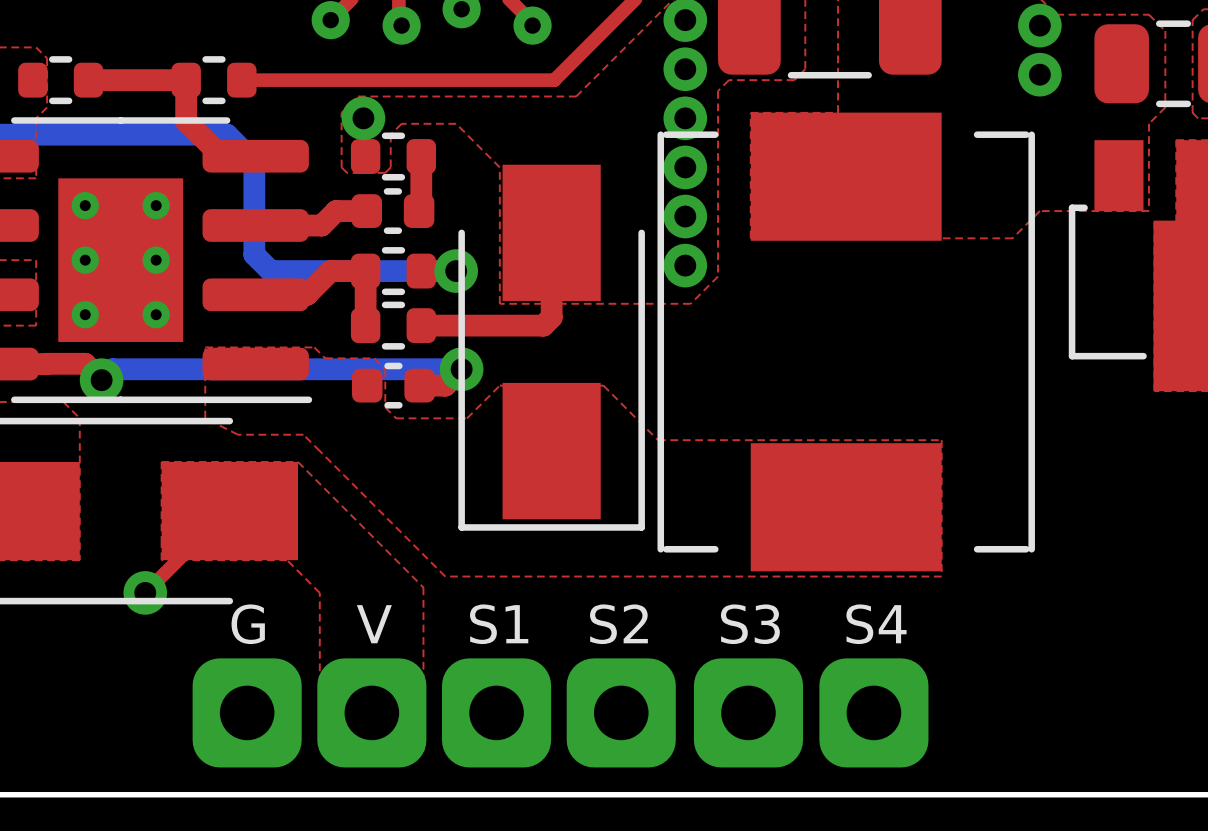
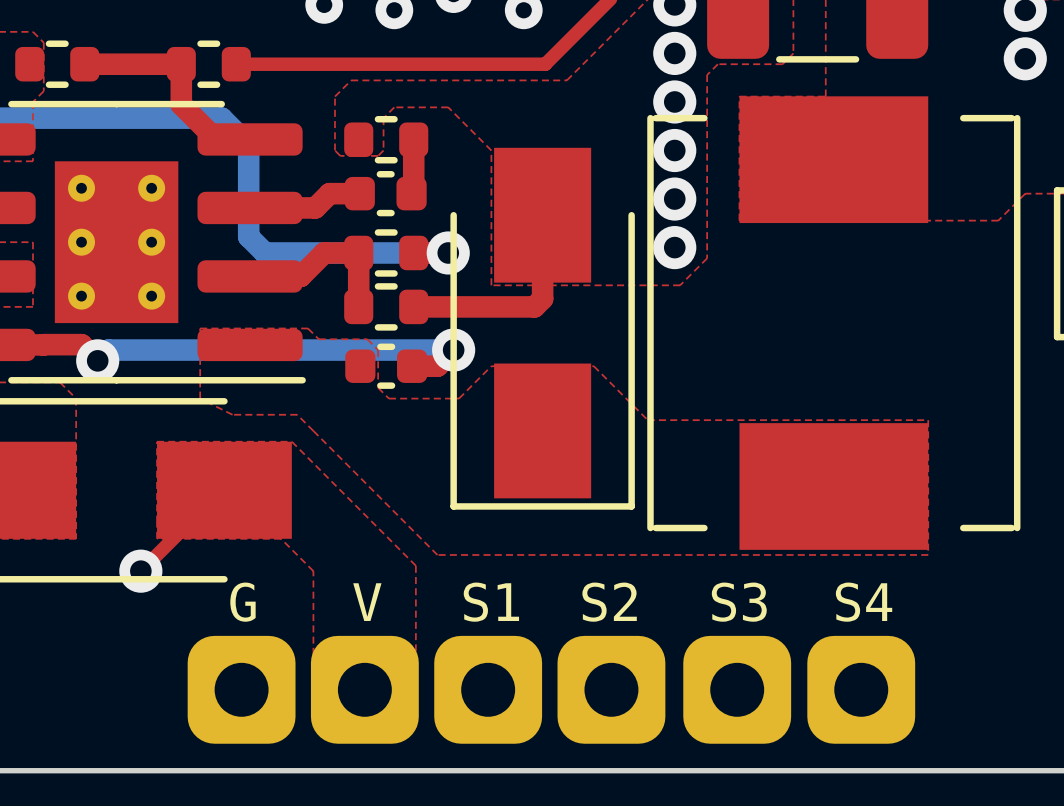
via: (363, 118) -> none

